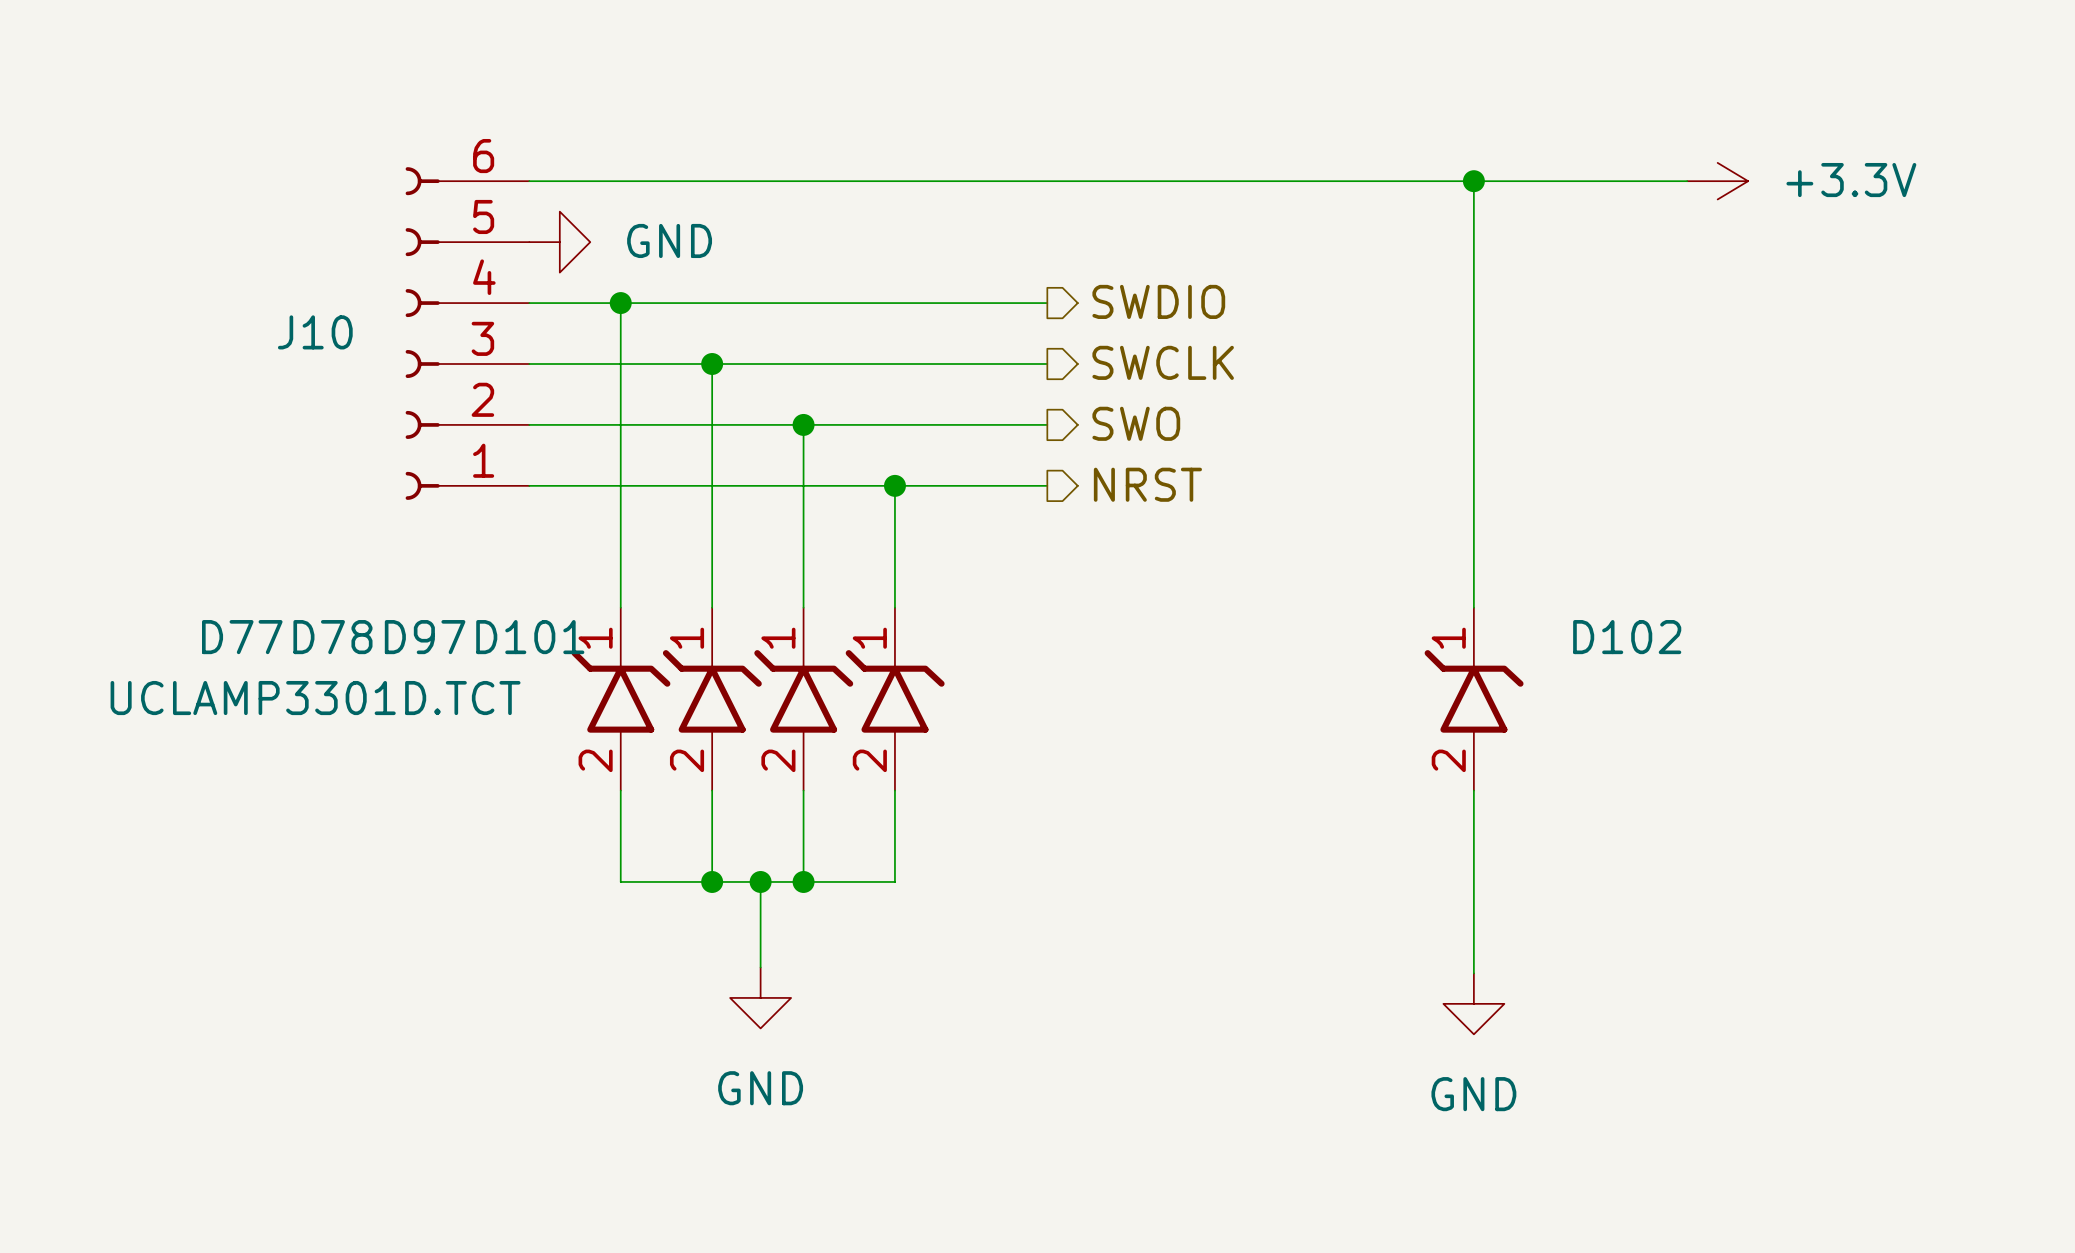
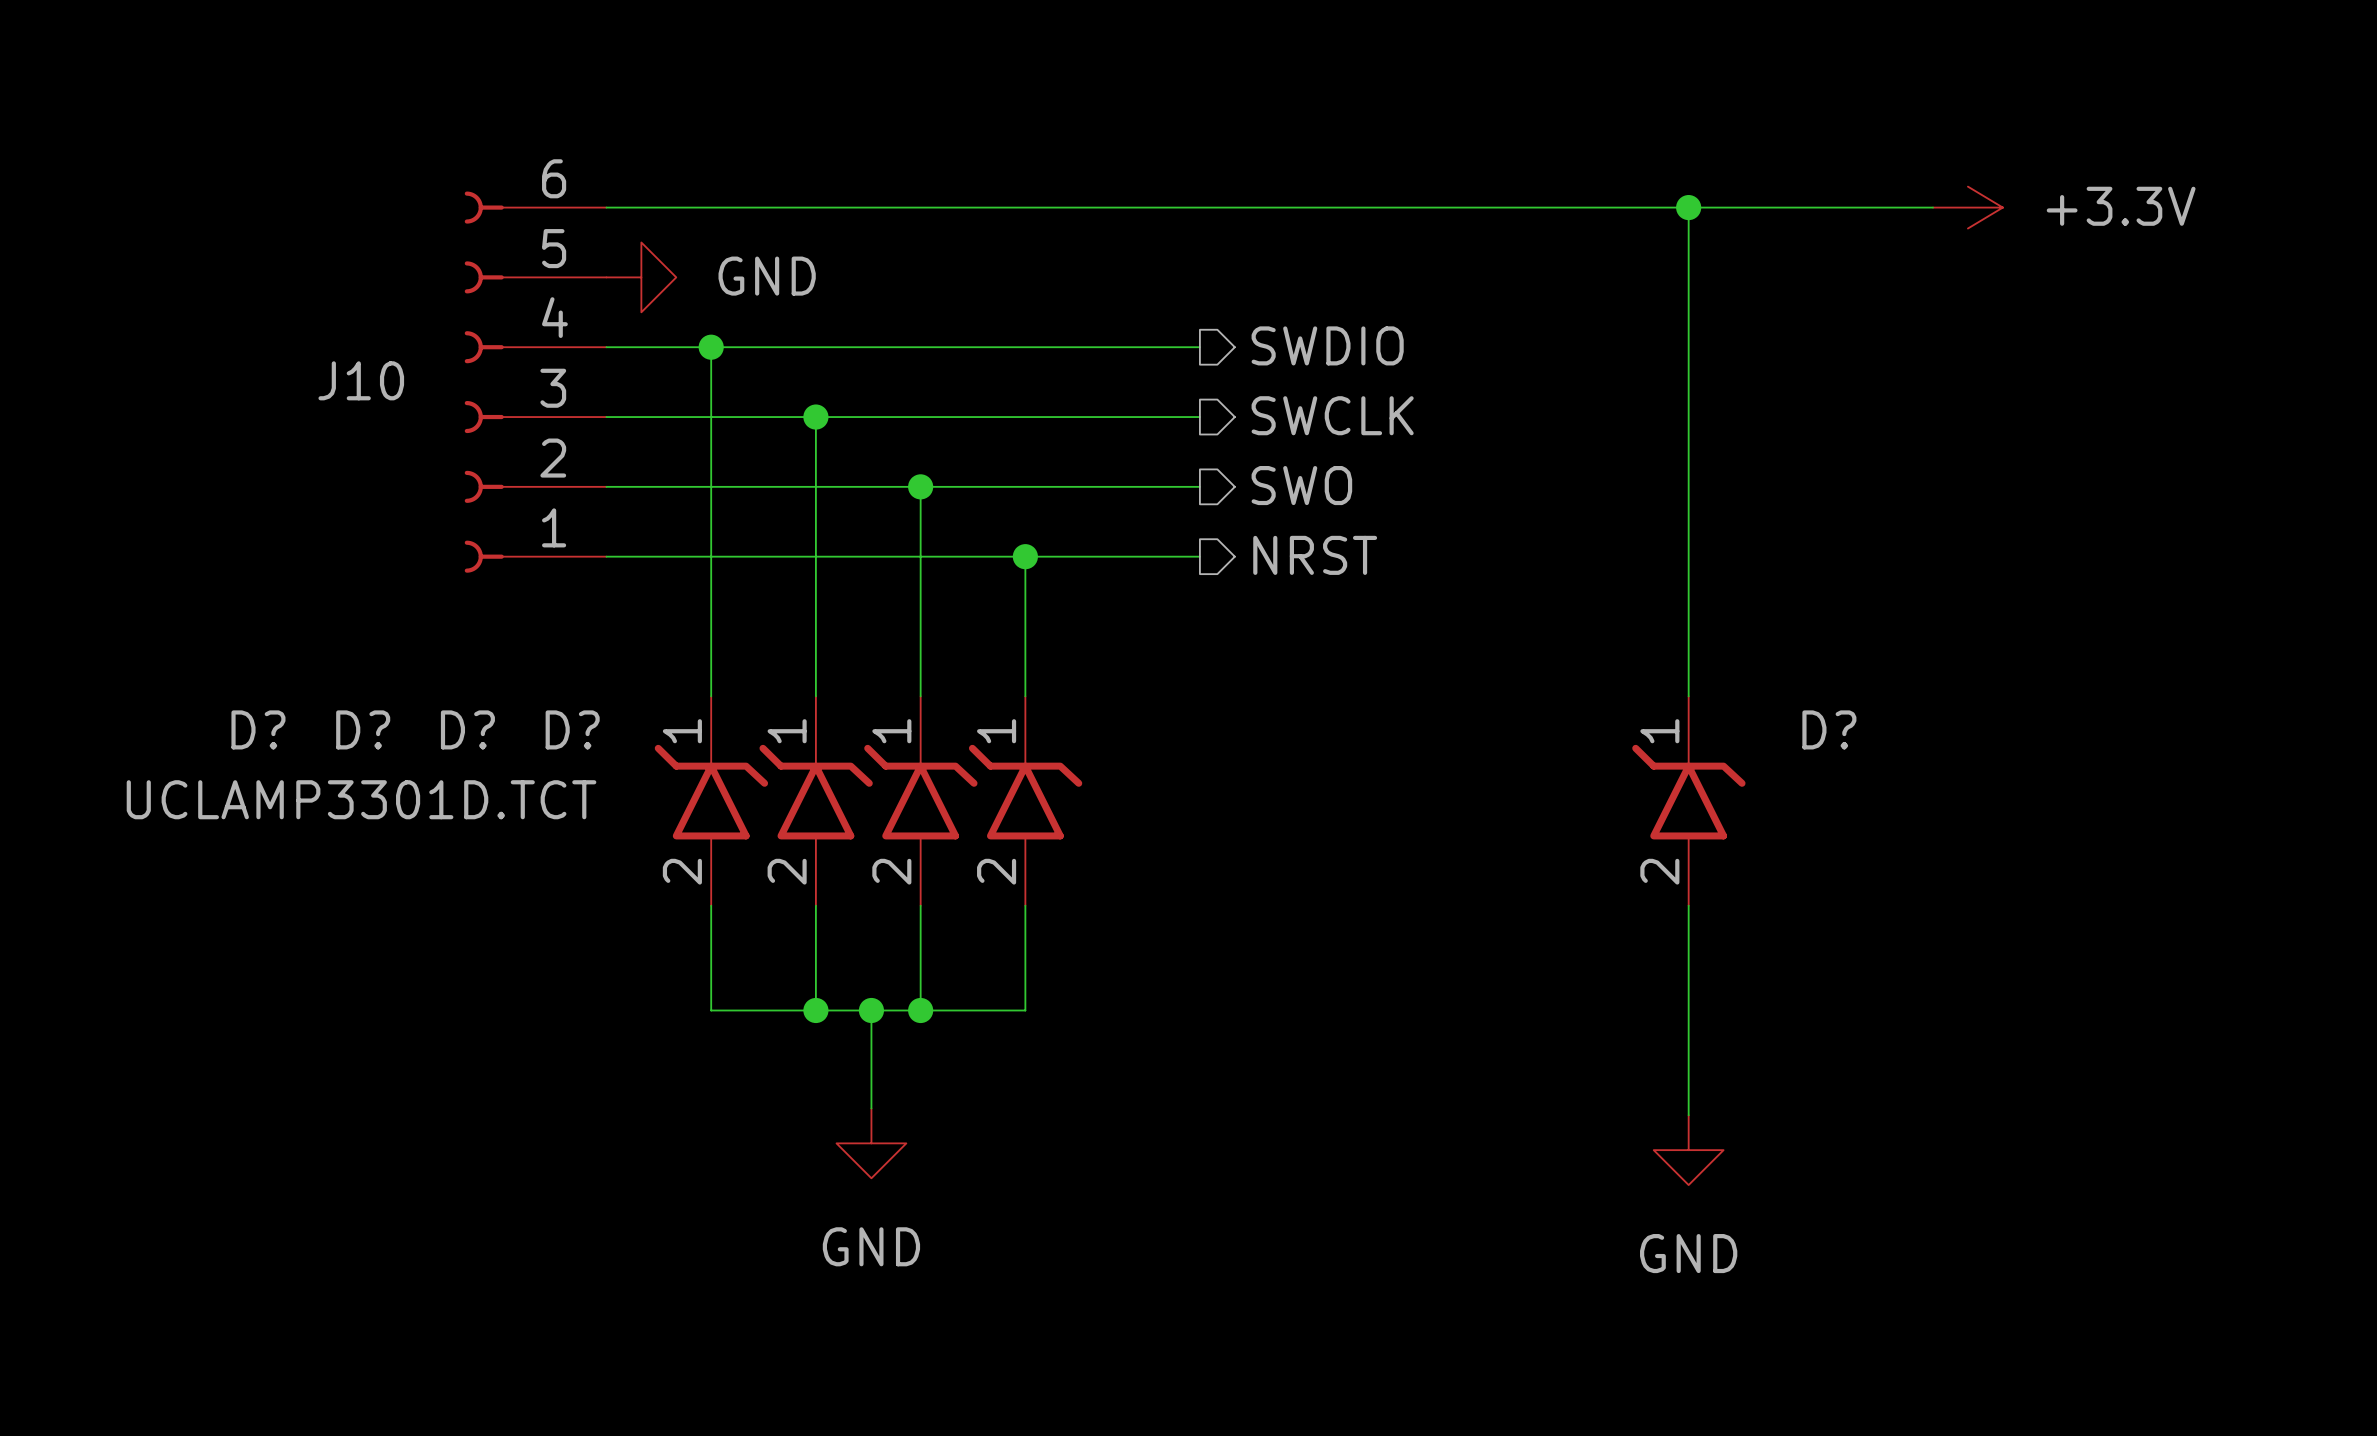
D77 name: D77 (242, 637) -> D? (258, 729)
D78 name: D78 (332, 637) -> D? (363, 729)
D97 name: D97 (425, 637) -> D? (467, 729)
D101 name: D101 (530, 637) -> D? (572, 729)
D102 name: D102 (1627, 637) -> D? (1829, 729)

